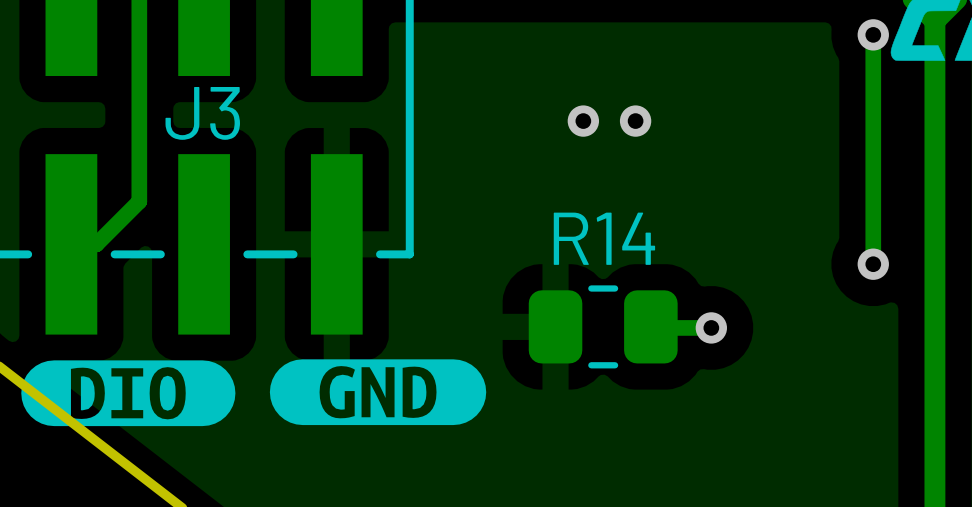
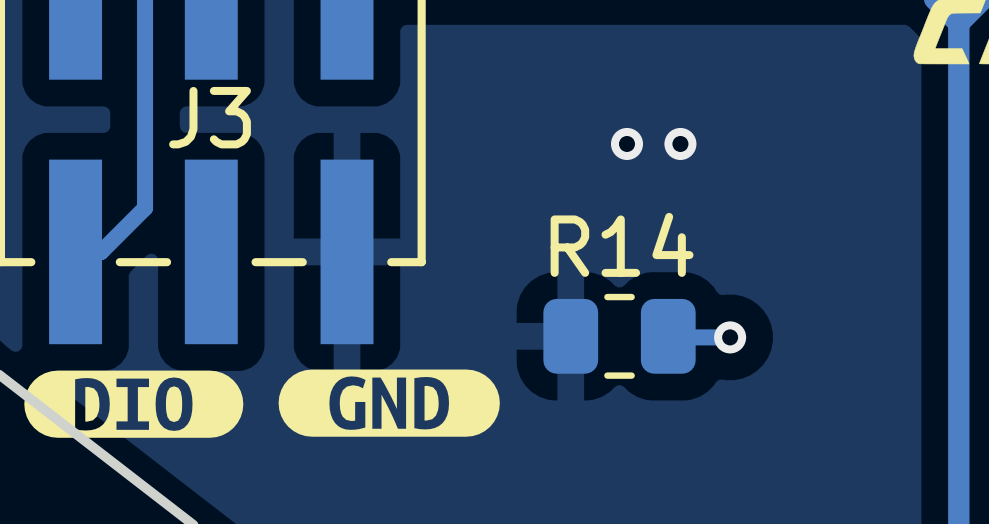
track: (873, 34) (873, 264) -> none
via: (873, 34) -> none
via: (583, 121) -> none
via: (635, 121) -> none
via: none -> (626, 143)
via: none -> (680, 143)
via: (873, 264) -> none

